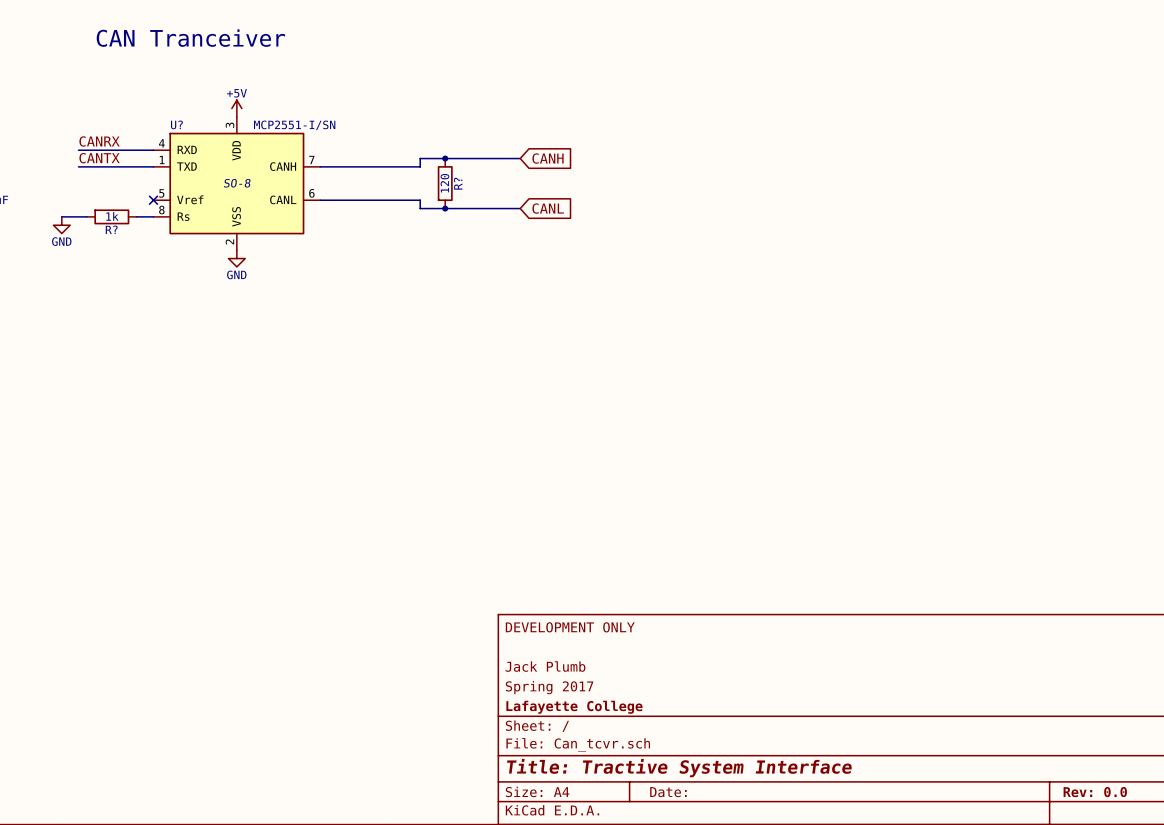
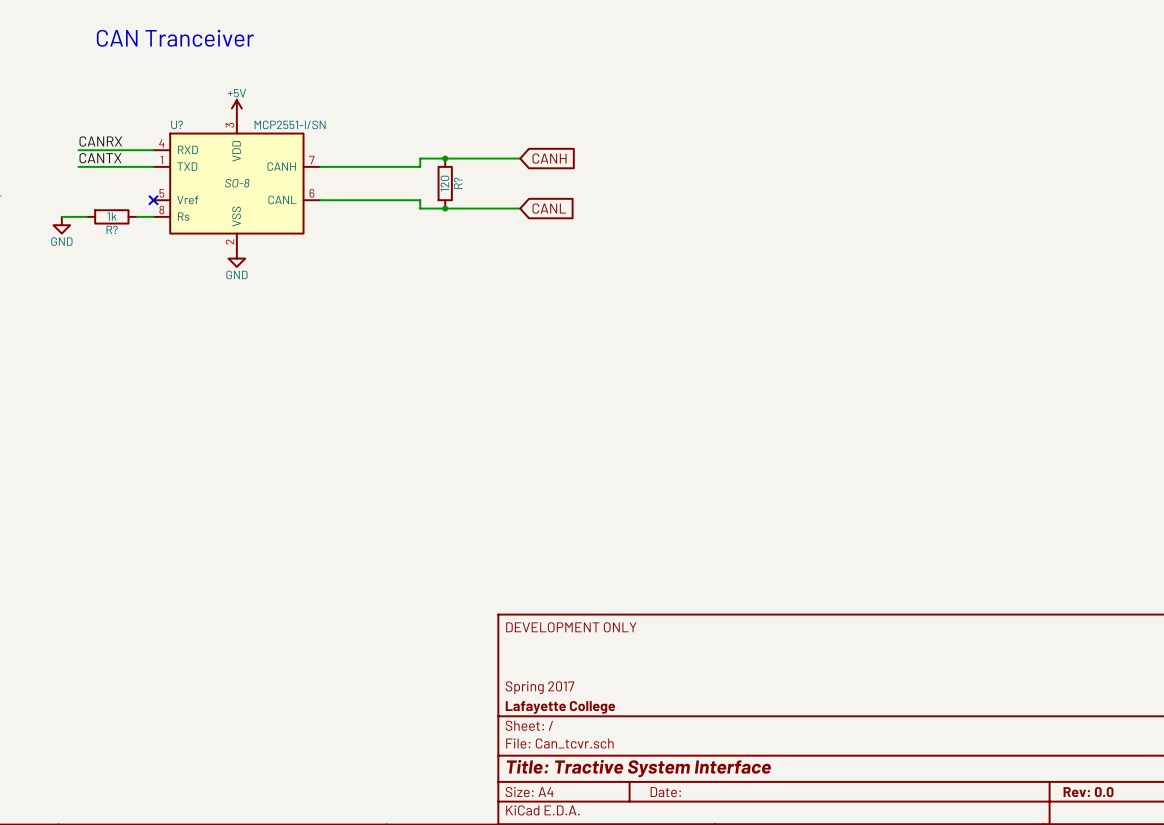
title block: Jack Plumb (545, 666) -> none

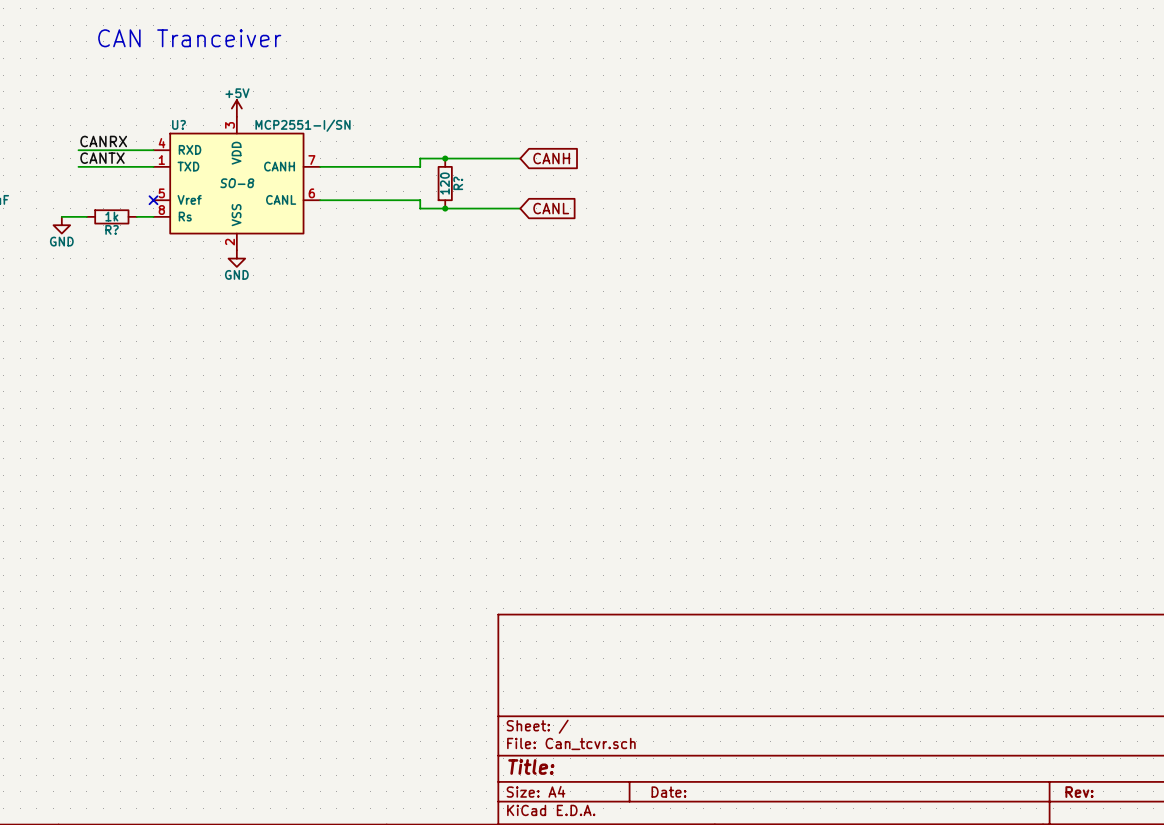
title block: DEVELOPMENT ONLY (571, 627) -> none
title block: Spring 2017 (539, 687) -> none
title block: Lafayette College (560, 707) -> none
title block: Title: Tractive System Interface (638, 768) -> Title: (531, 766)
title block: Rev: 0.0 (1088, 792) -> Rev: (1079, 792)

